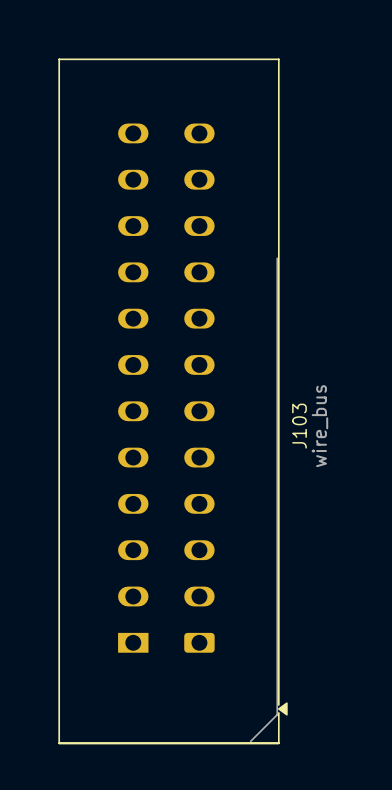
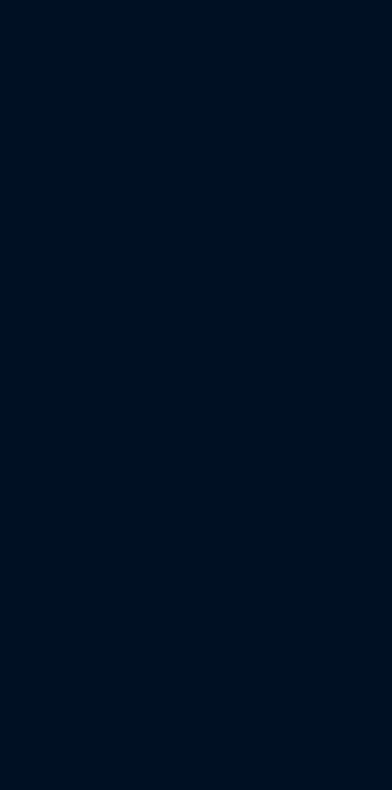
J103: wire_bus (173, 401) -> none

